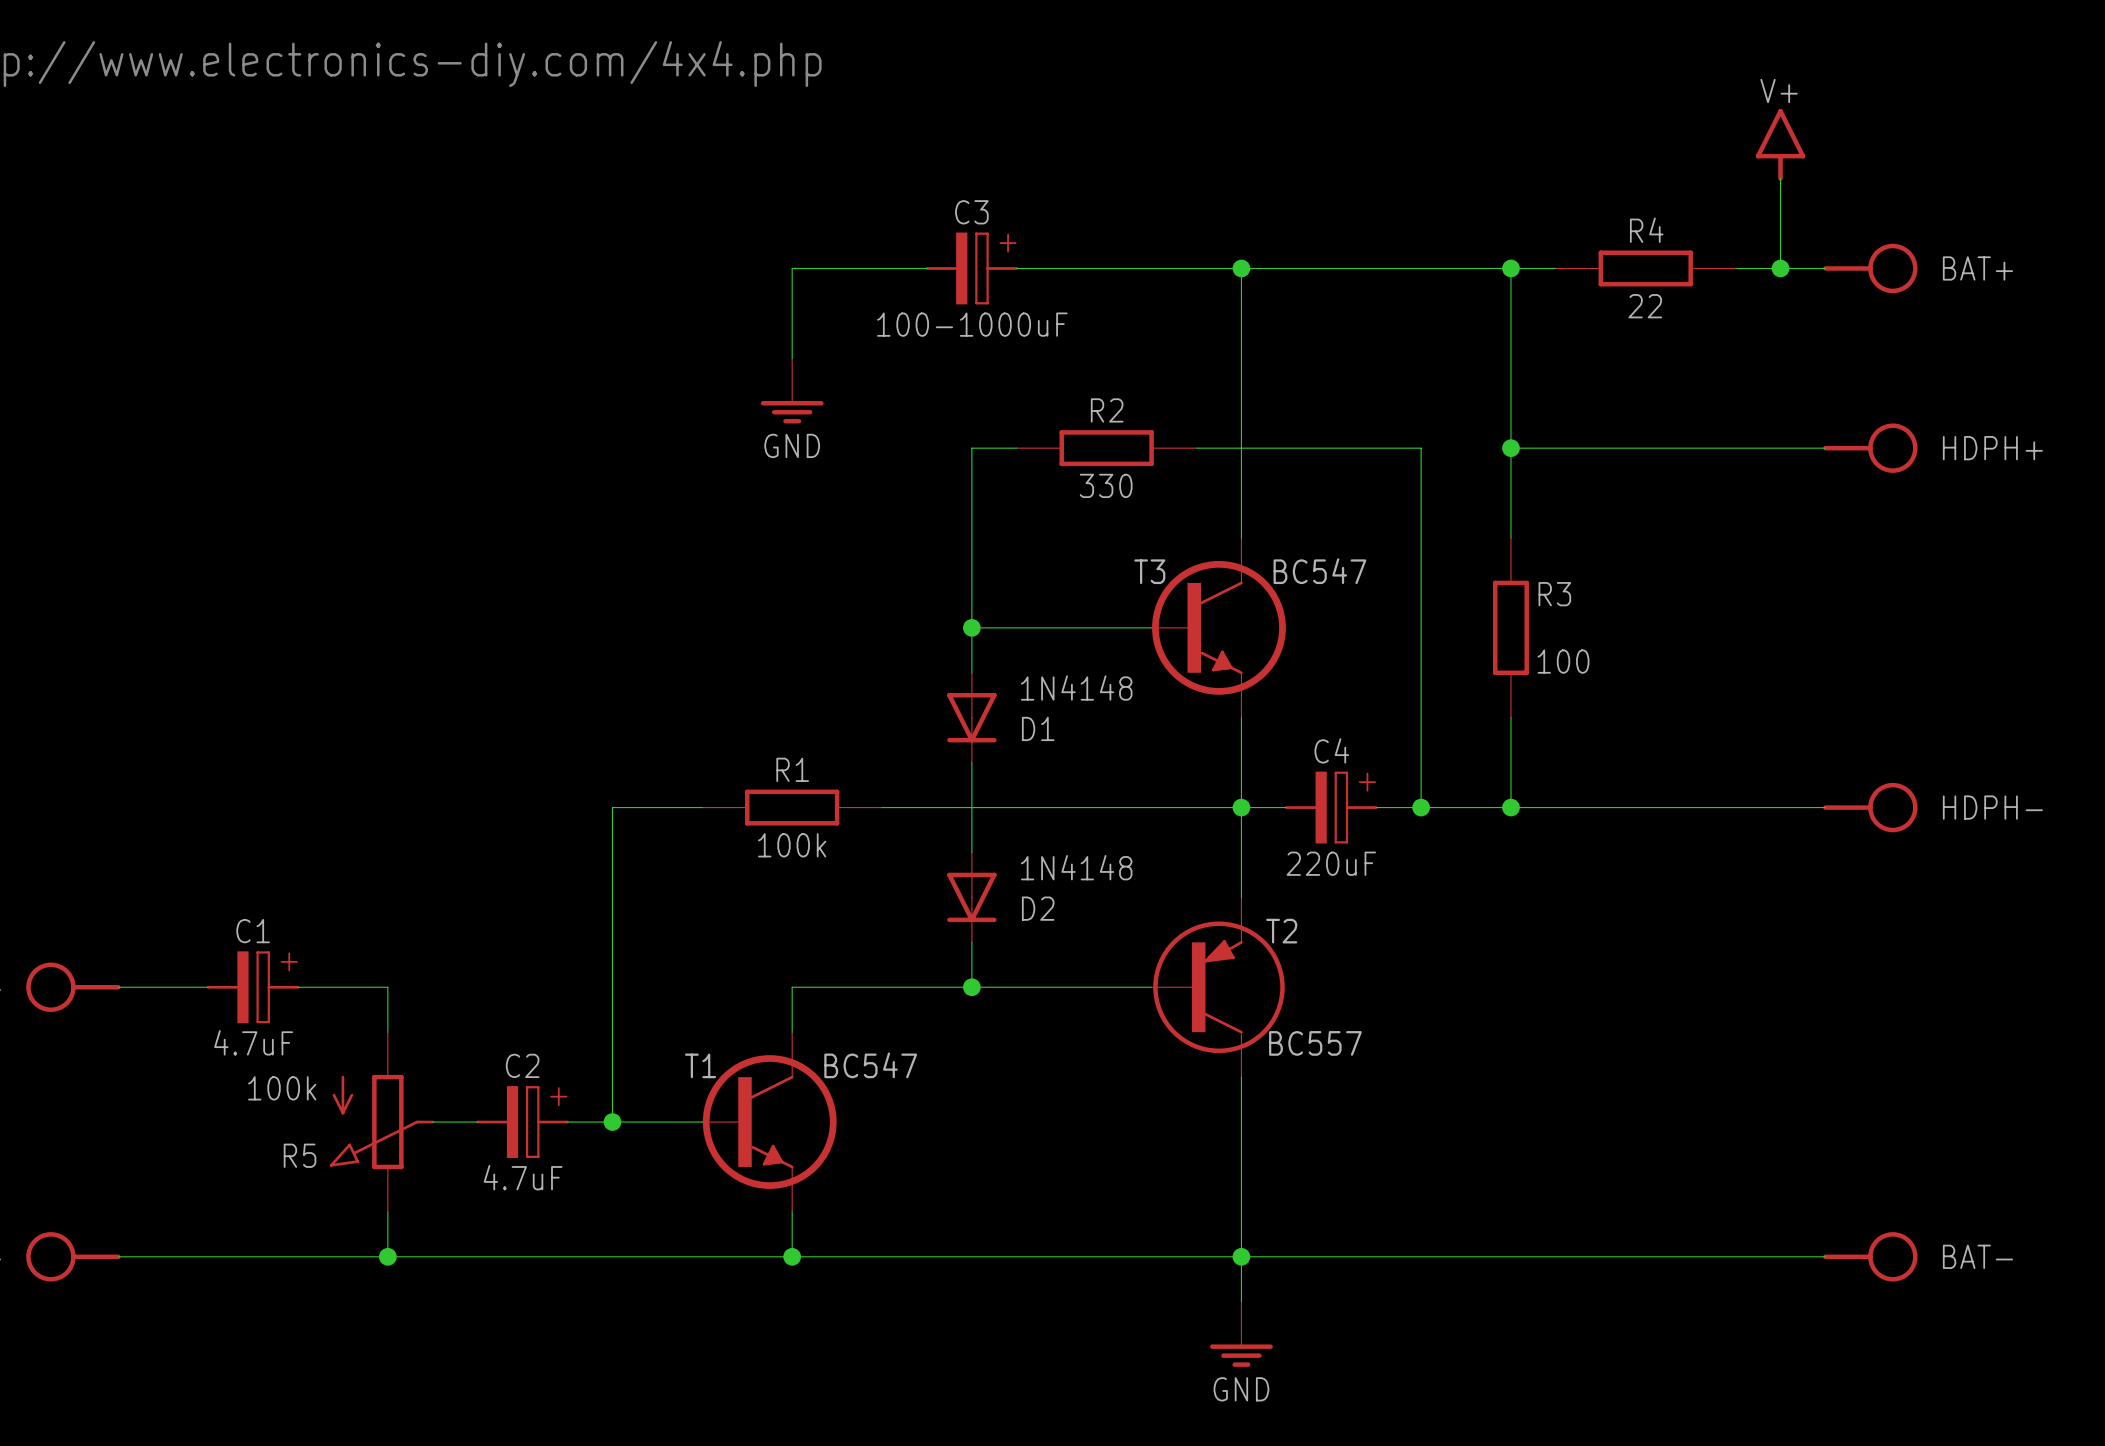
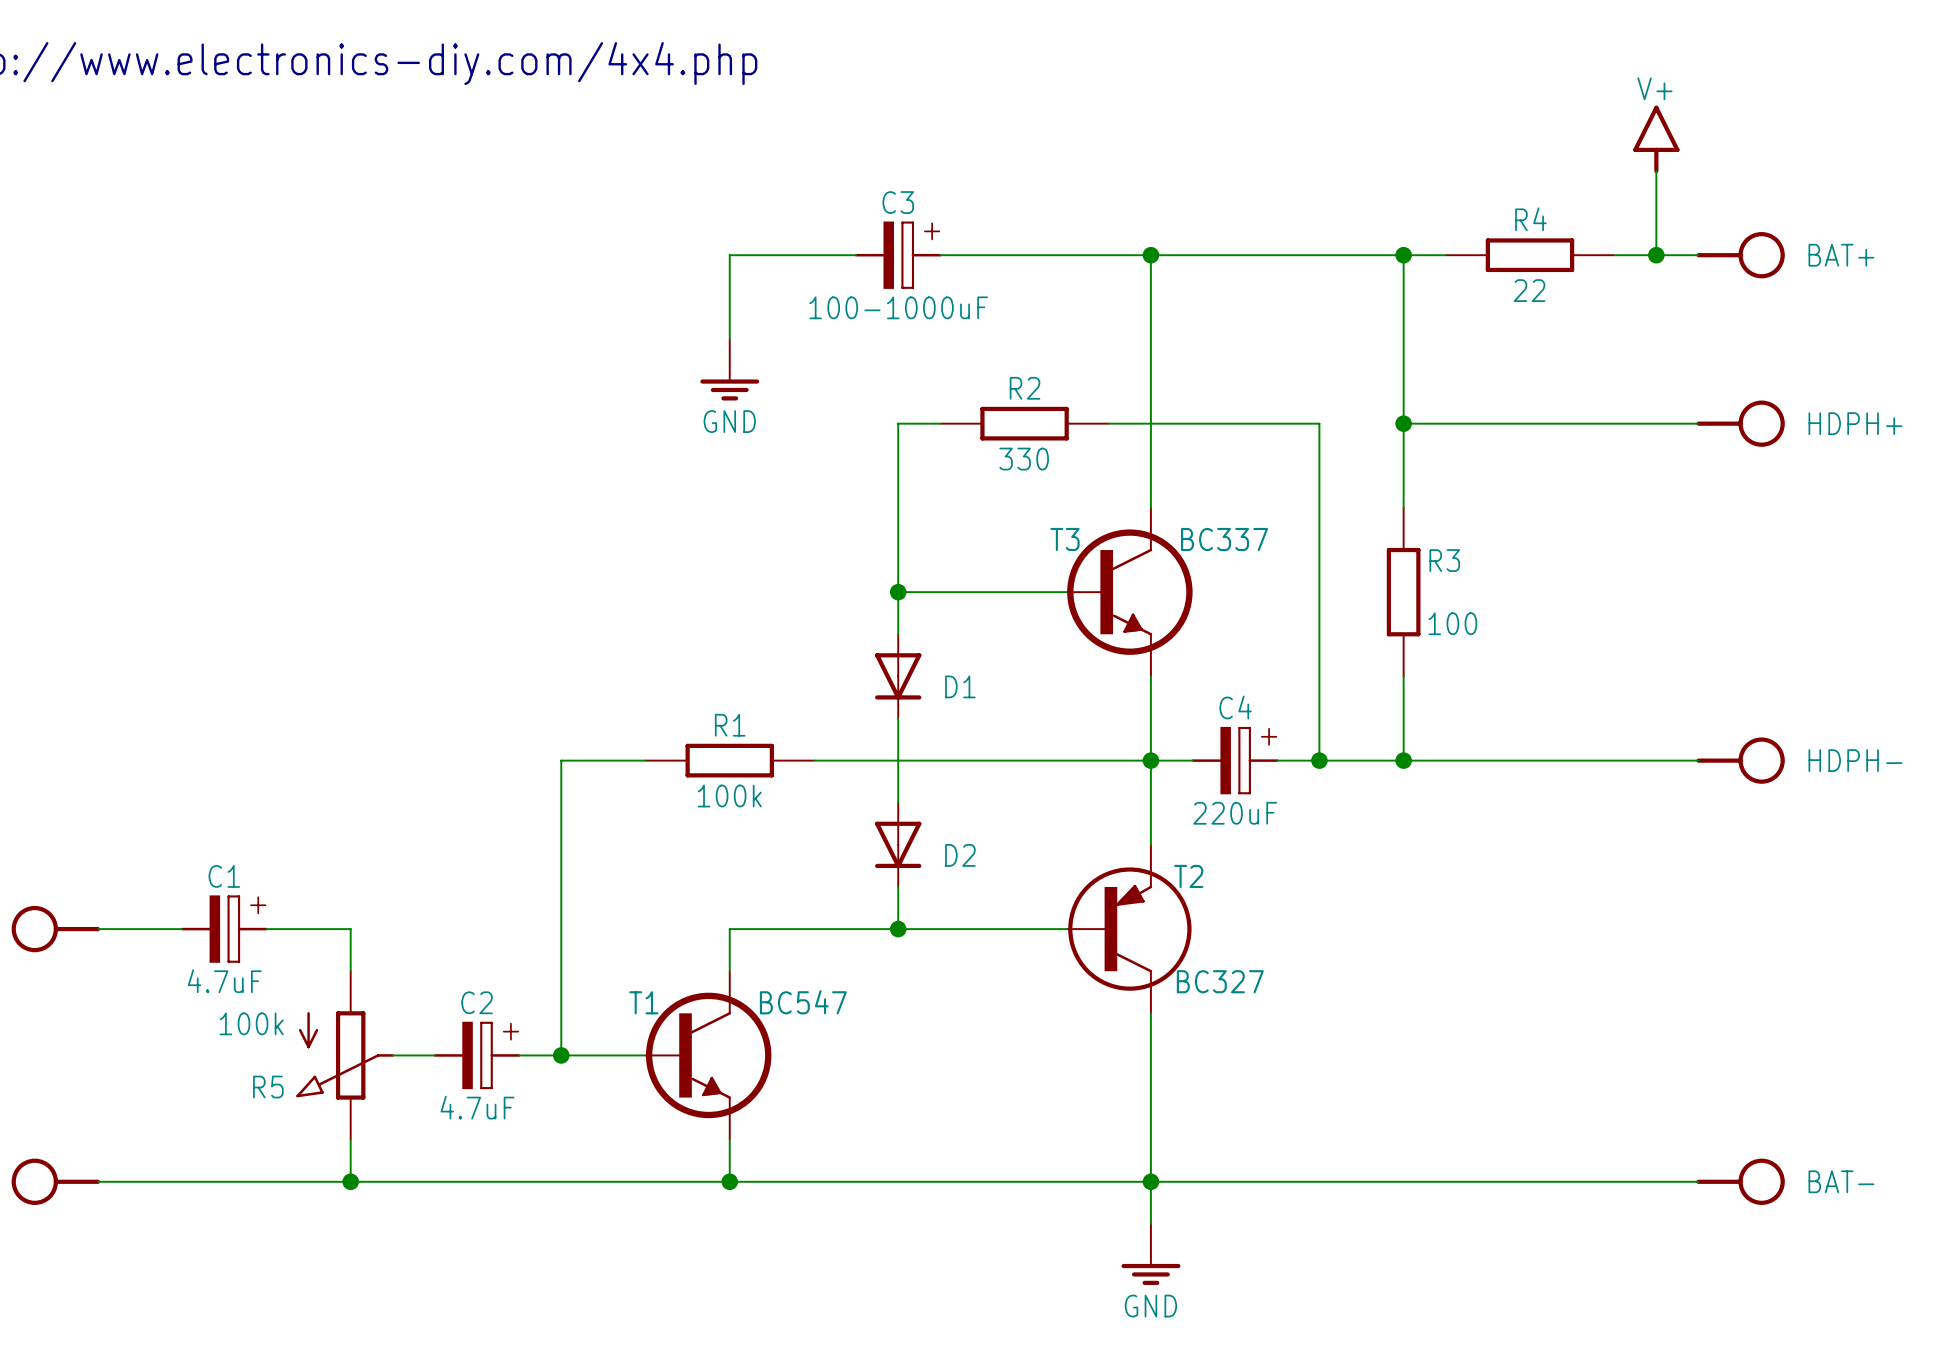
T3 value: BC547 (1319, 571) -> BC337 (1224, 539)
D1 value: 1N4148 (1076, 687) -> none
D2 value: 1N4148 (1076, 867) -> none
T2 value: BC557 (1315, 1043) -> BC327 (1220, 981)

